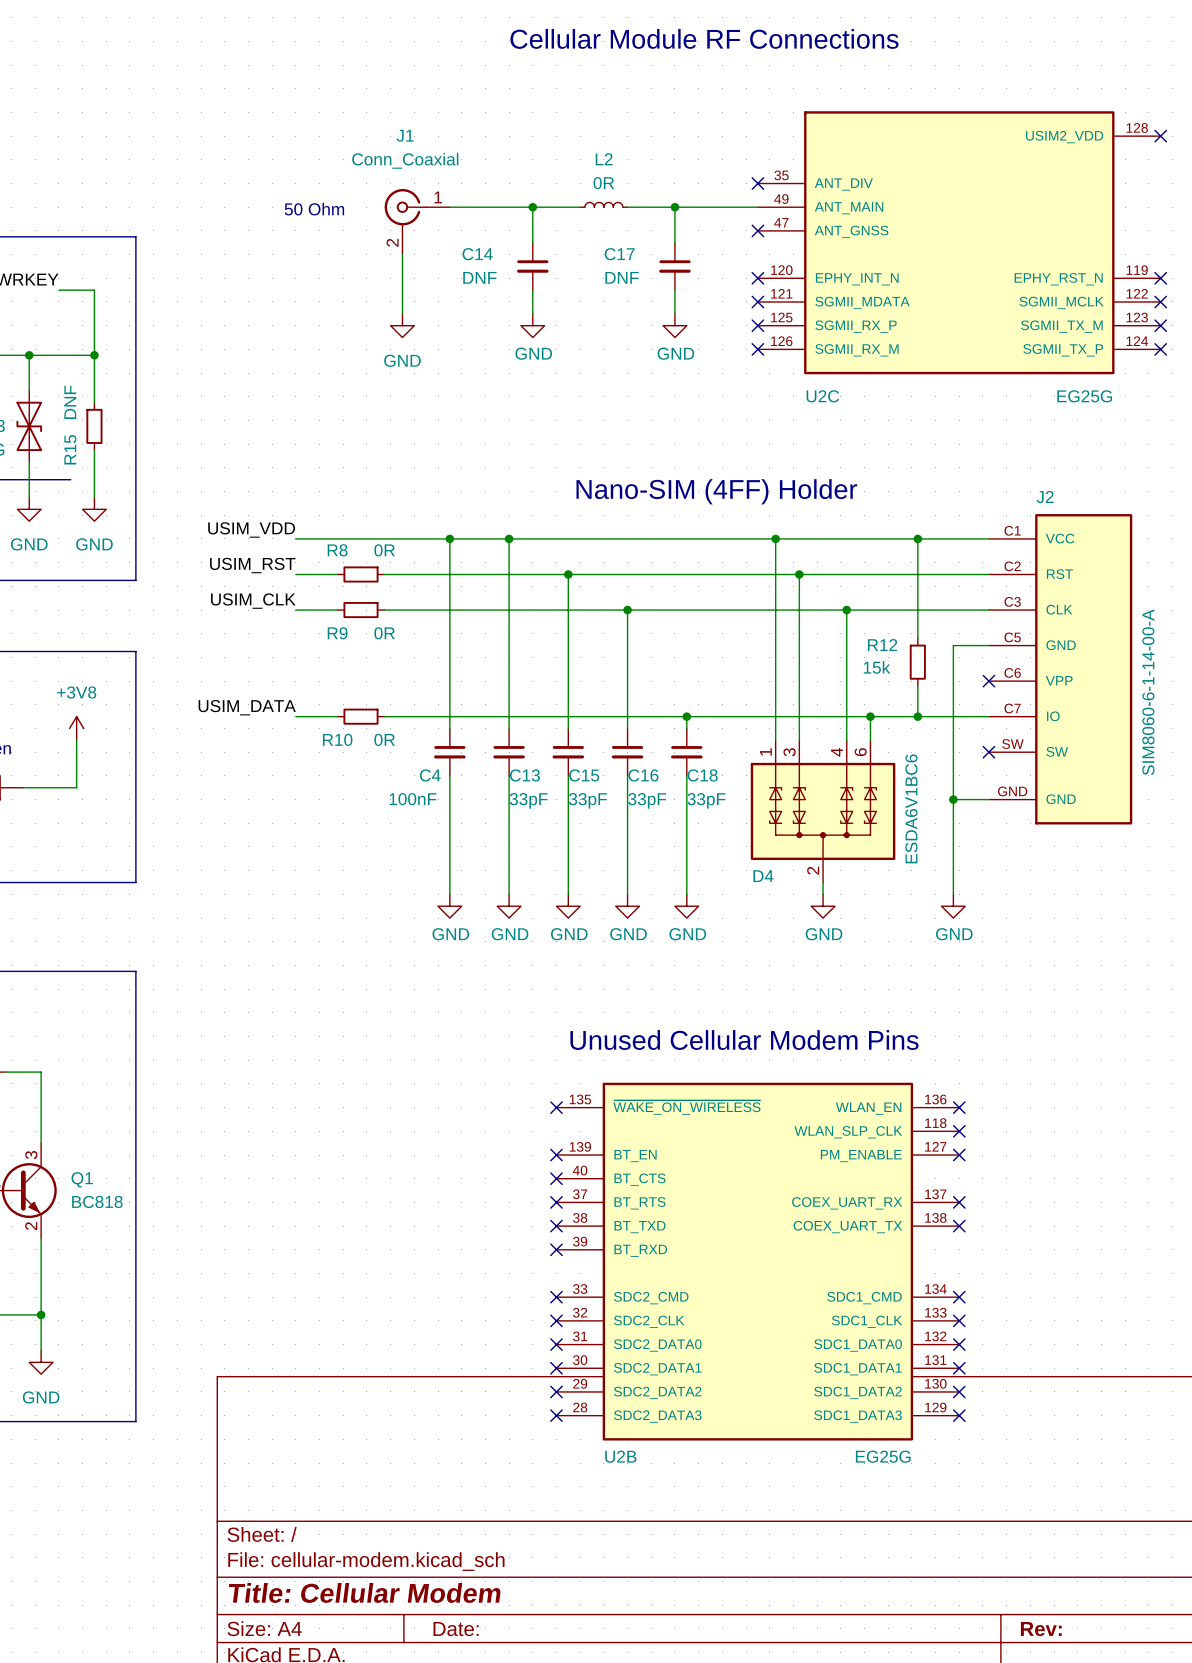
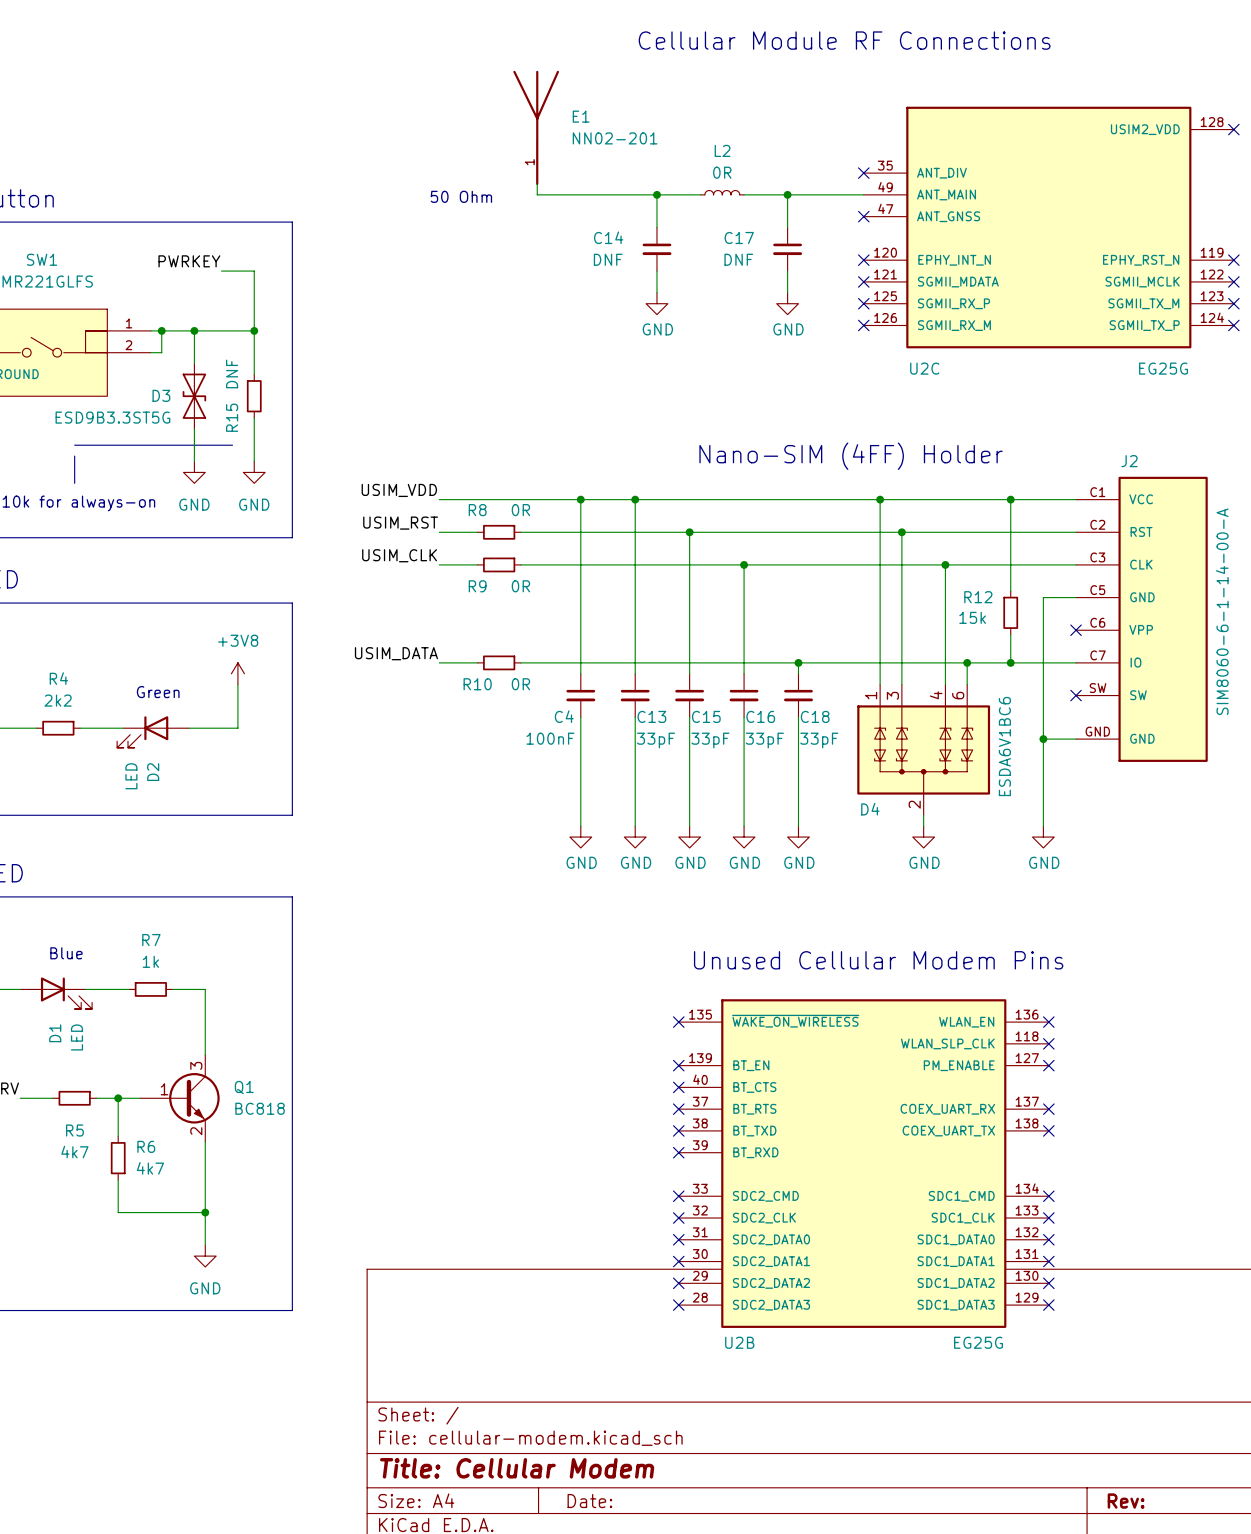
E1: none -> NN02-201 (536, 127)
J1: Conn_Coaxial (417, 221) -> none
wire: (402, 254) (402, 313) -> none
power symbol: GND (402, 325) -> none

